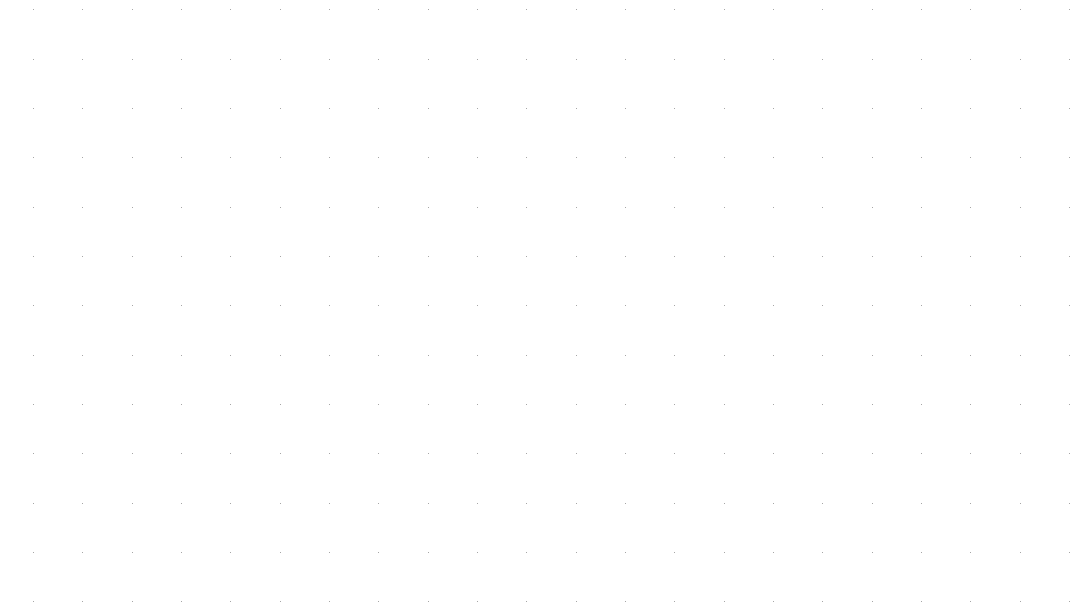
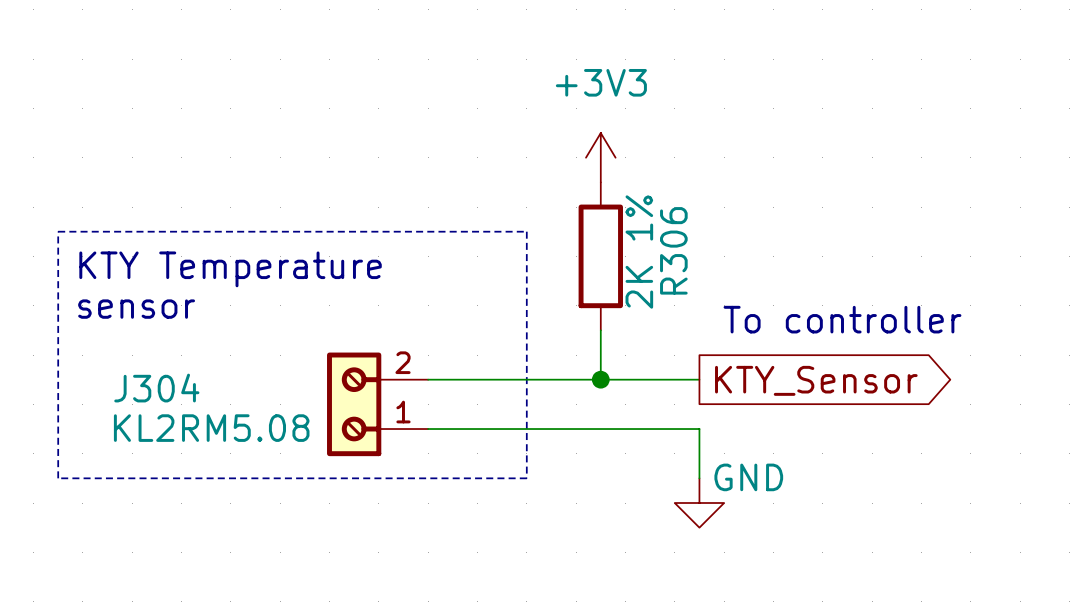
power symbol: none -> +3V3 (600, 157)
line: none -> (58, 231) (526, 231) (526, 478) (58, 478) (58, 231)
R306: none -> 2K 1% (600, 256)
text: none -> KTY Temperature (230, 269)
text: none -> sensor (136, 309)
text: none -> To controller (842, 319)
wire: none -> (600, 330) (600, 379)
wire: none -> (428, 379) (699, 379)
junction: none -> (600, 379)
global label: none -> KTY_Sensor (816, 380)
J304: none -> KL2RM5.08 (377, 404)
wire: none -> (428, 429) (699, 429) (699, 478)
power symbol: none -> GND (699, 503)

